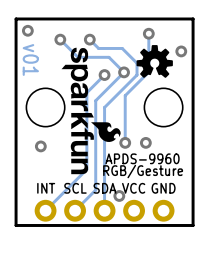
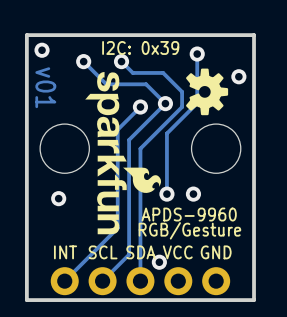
text: none -> I2C: 0x39 (140, 47)
drawing shape: [136, 45, 173, 78] -> [186, 68, 229, 116]

